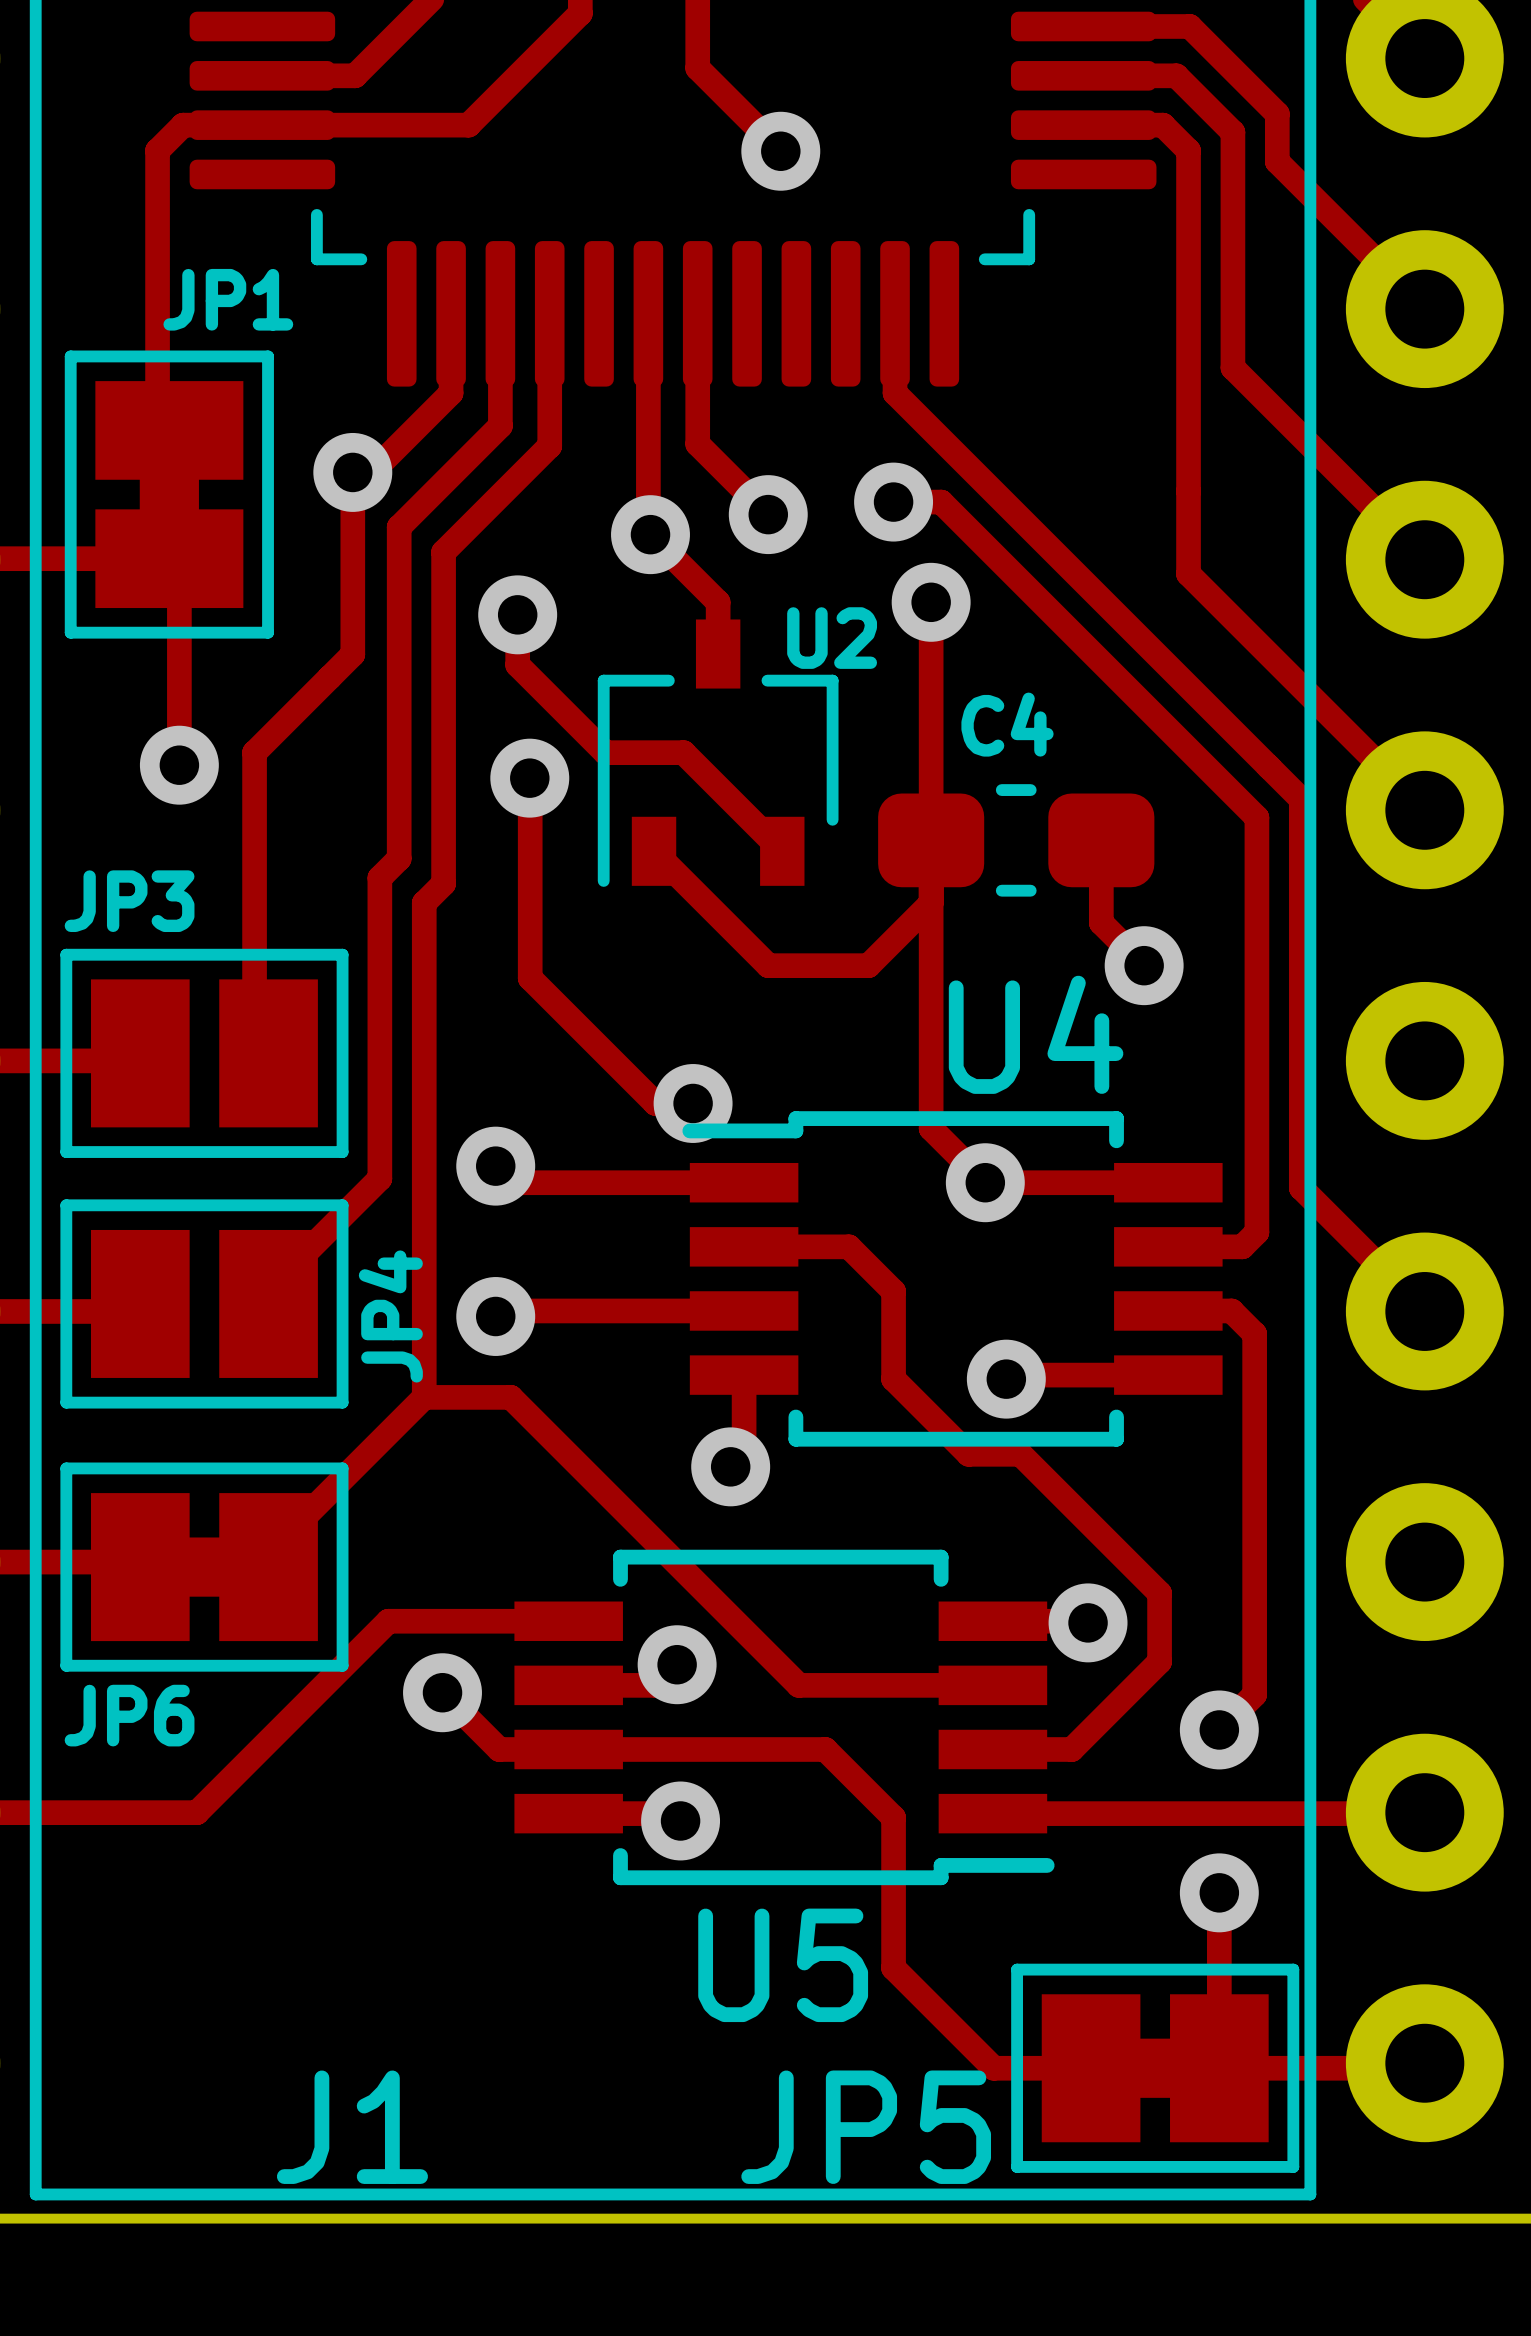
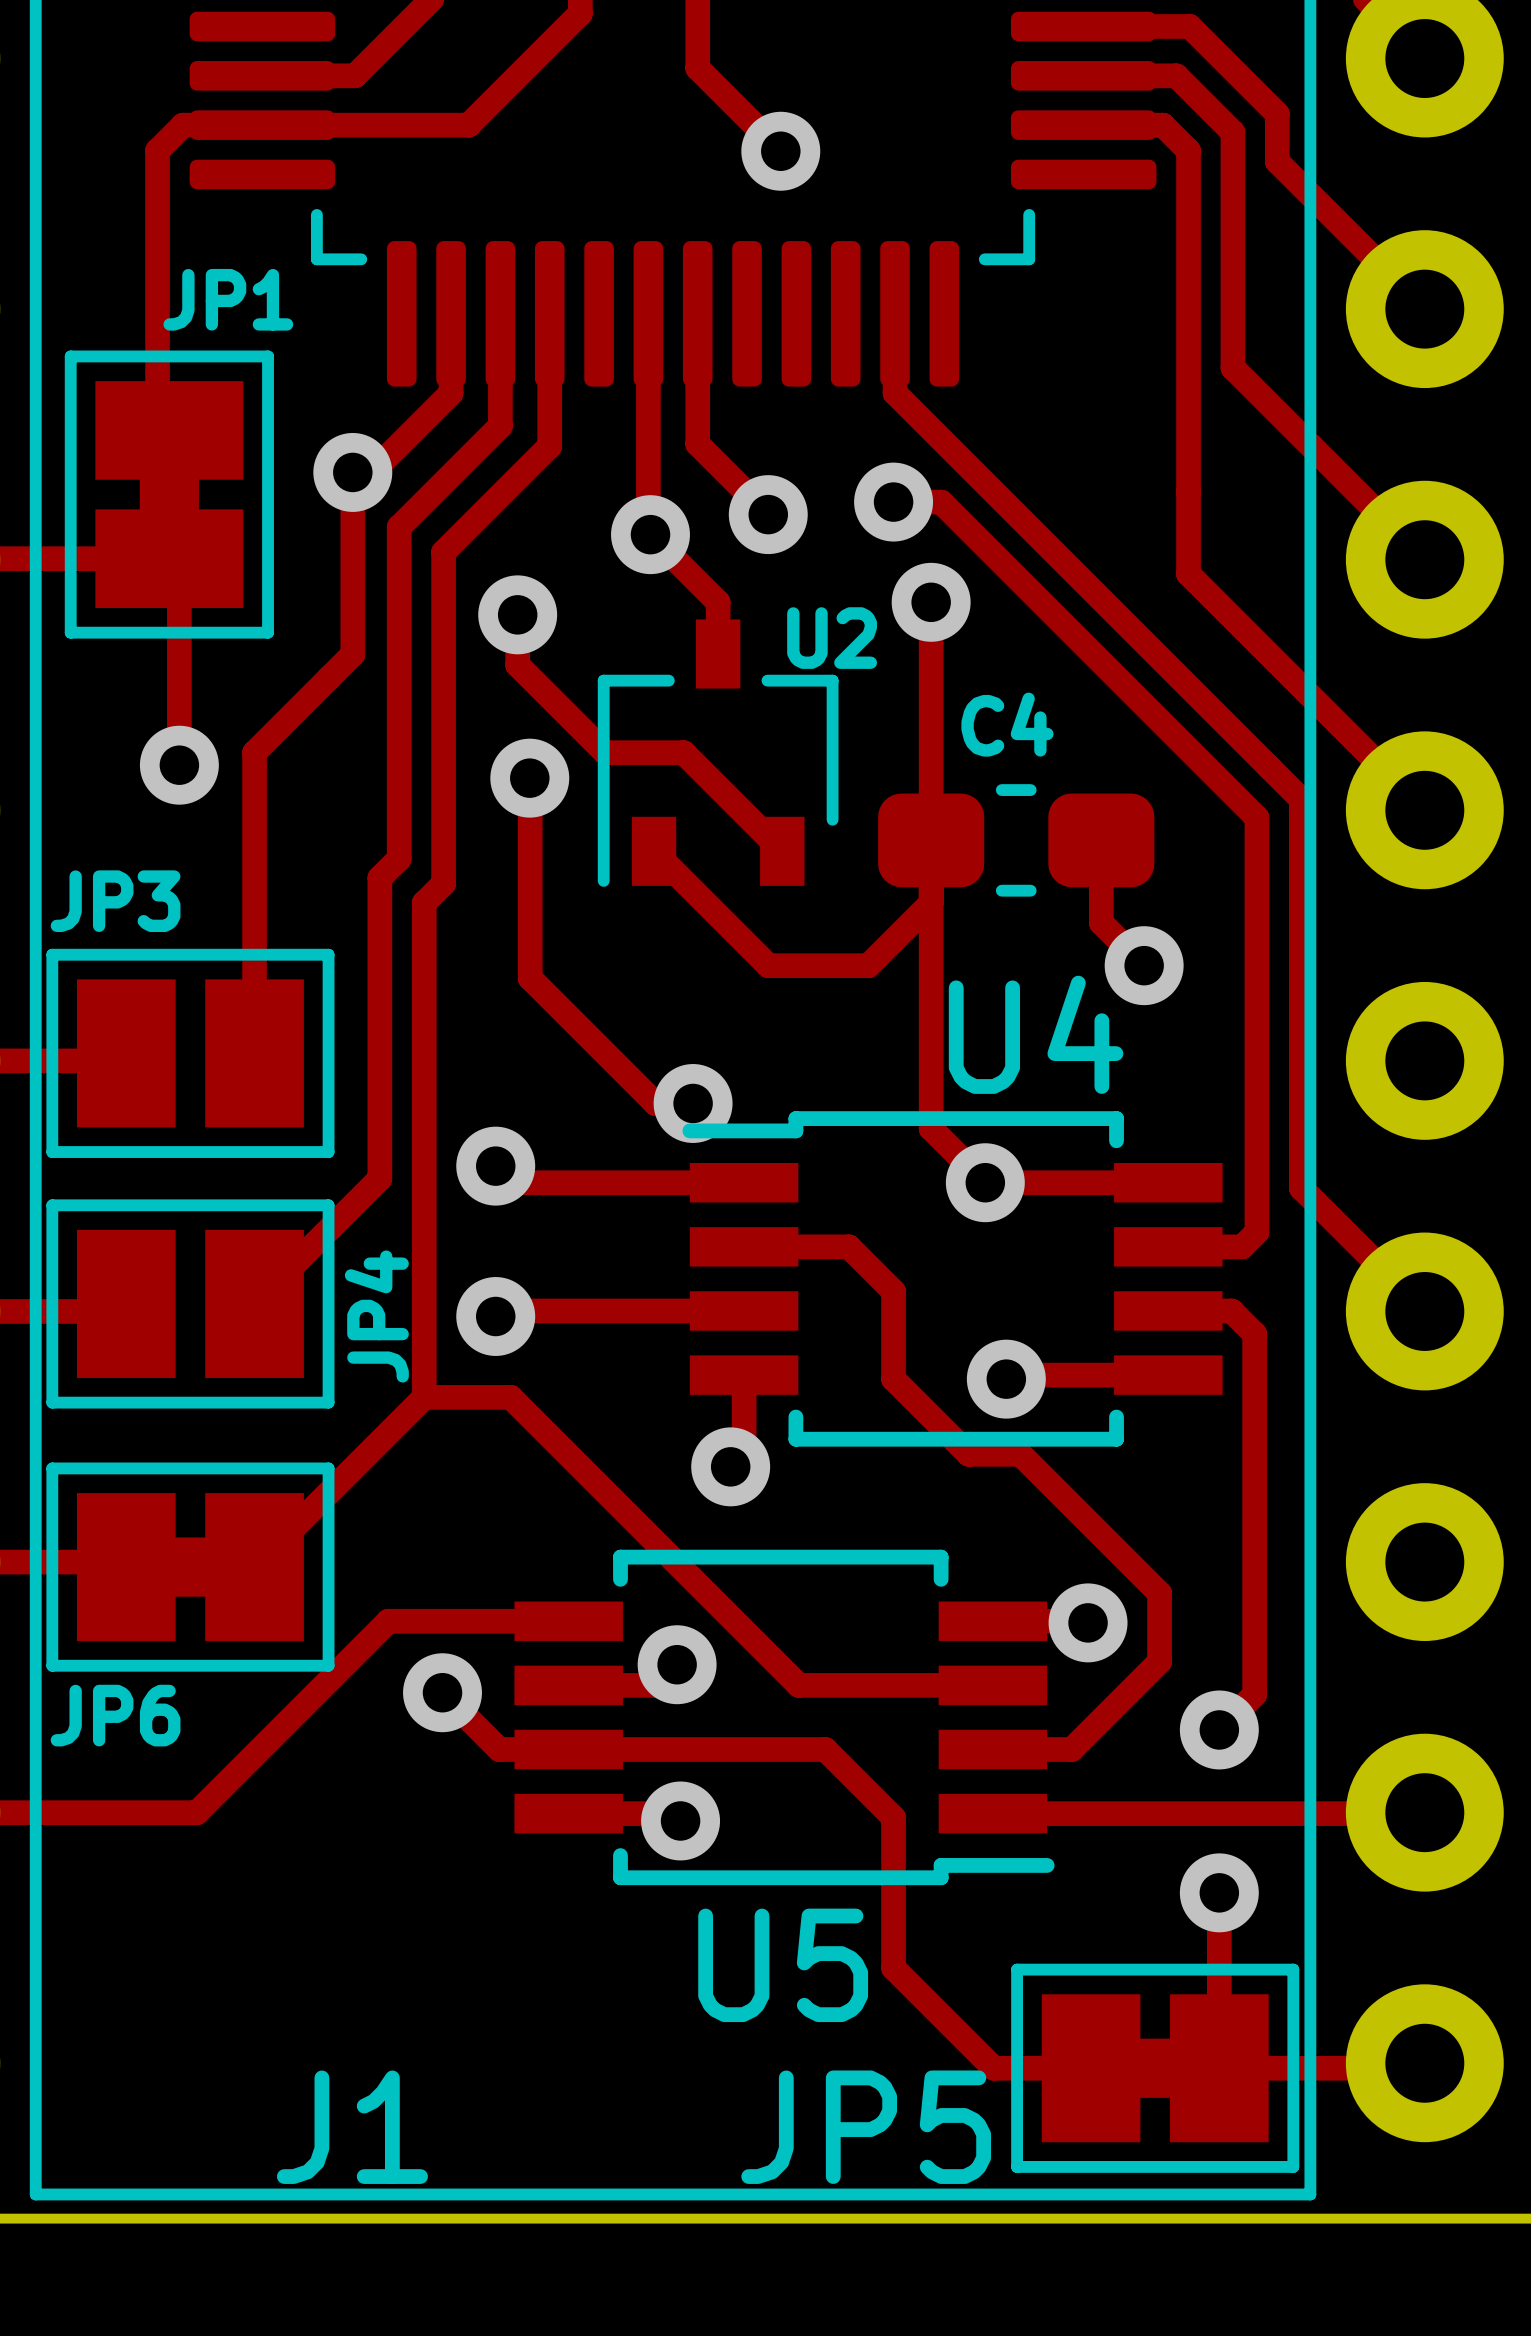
JP3 position: (204, 1053) -> (190, 1053)
JP4 position: (204, 1303) -> (190, 1303)
JP6 position: (204, 1567) -> (190, 1567)

